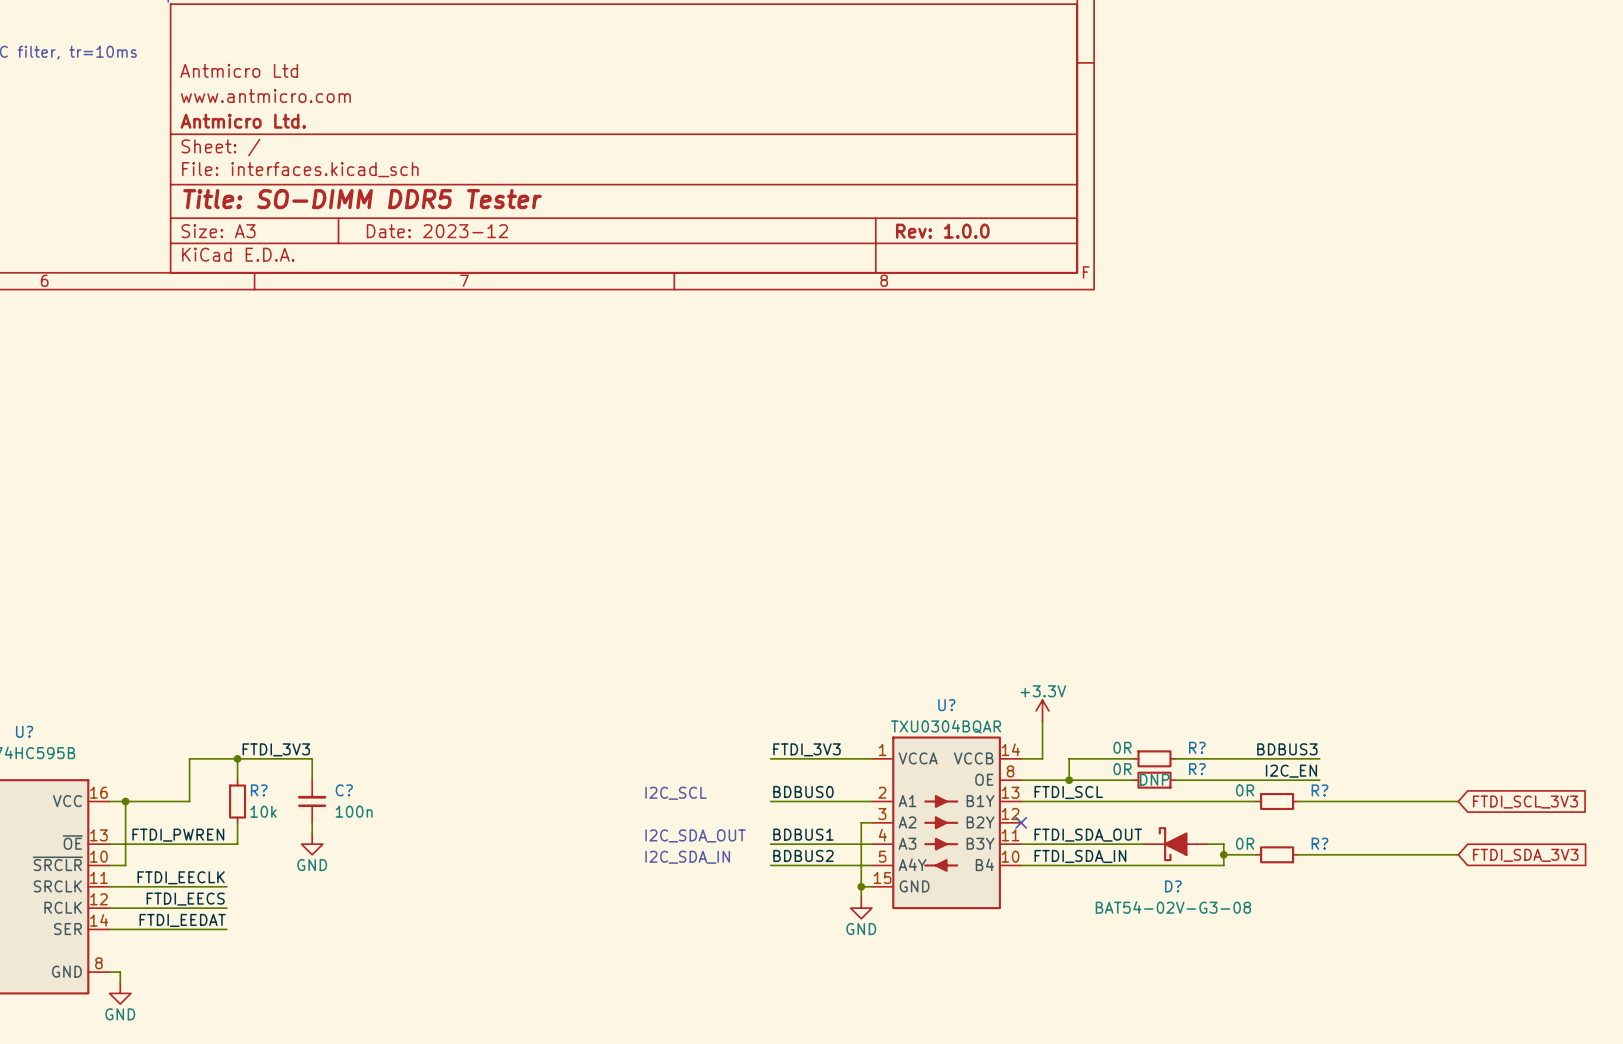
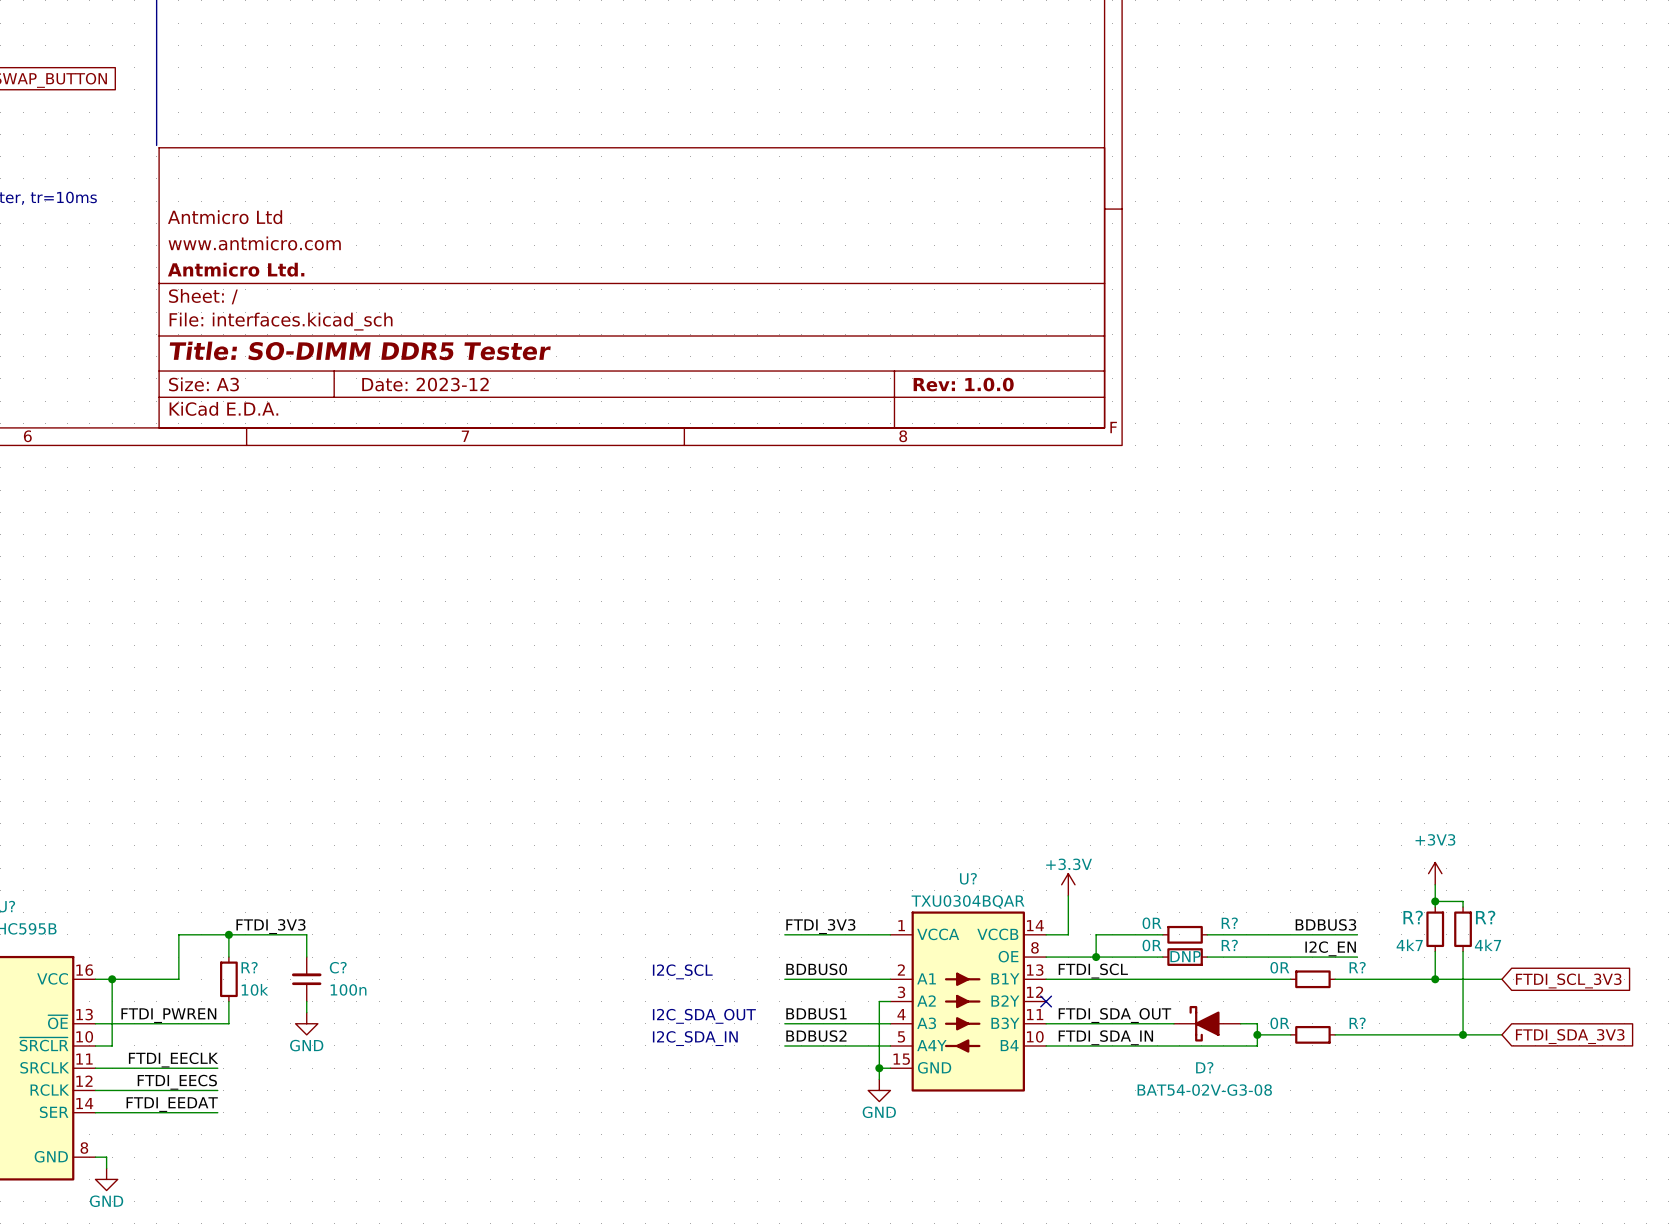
power symbol: none -> +3V3 (1435, 873)
wire: none -> (1435, 884) (1435, 907)
wire: none -> (1435, 901) (1463, 901) (1463, 907)
junction: none -> (1435, 901)
R?: none -> (1435, 929)
R?: none -> (1463, 929)
wire: none -> (1435, 951) (1435, 979)
wire: none -> (1463, 951) (1463, 1034)
junction: none -> (1435, 979)
junction: none -> (1463, 1034)

